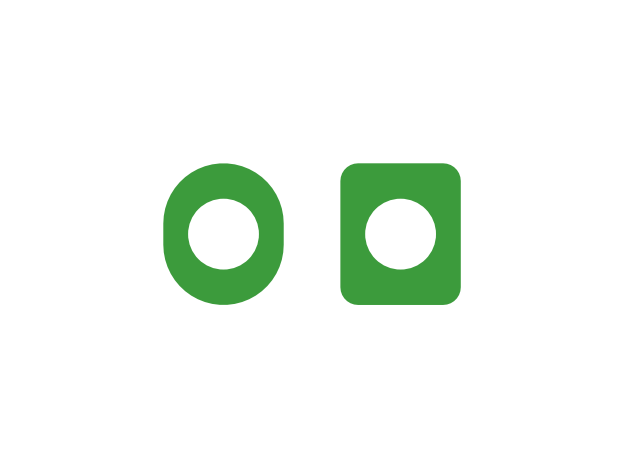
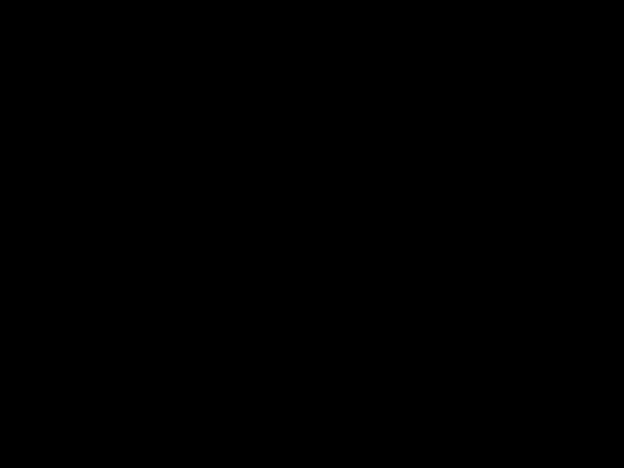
part: (312, 234) -> none

